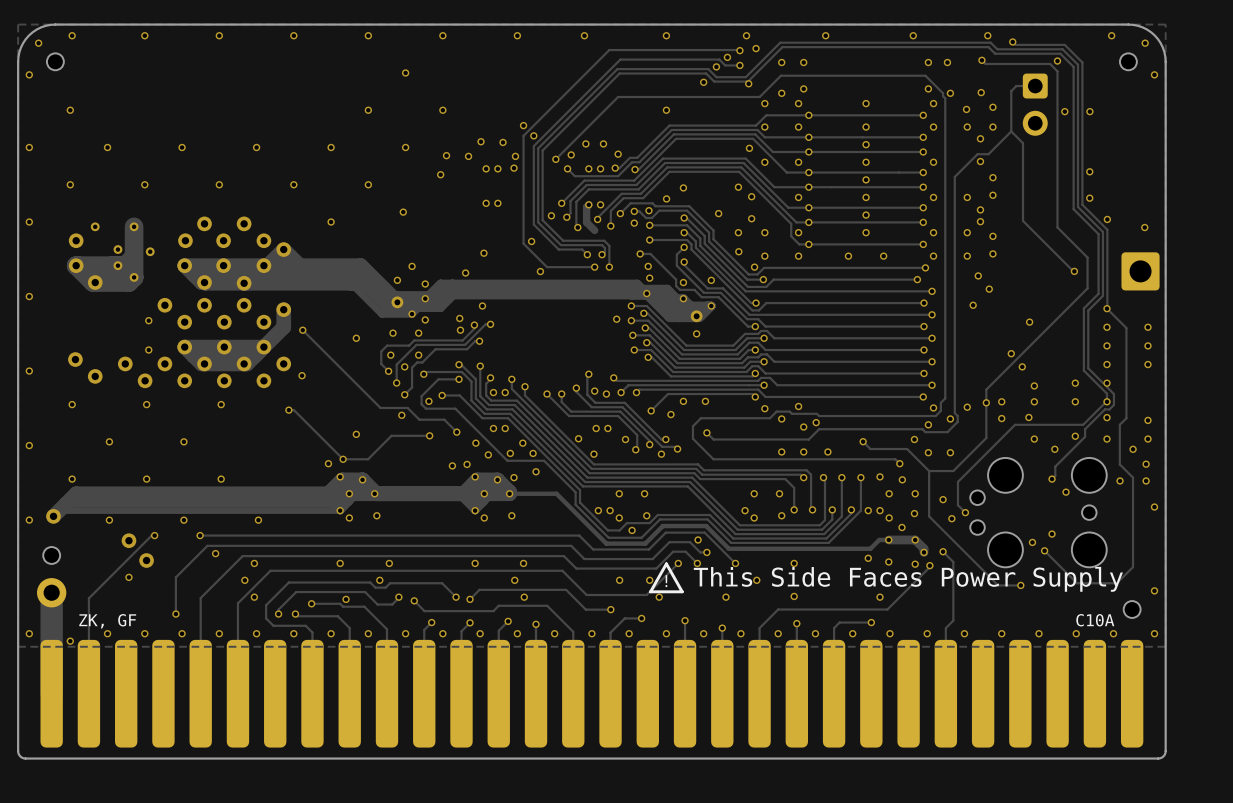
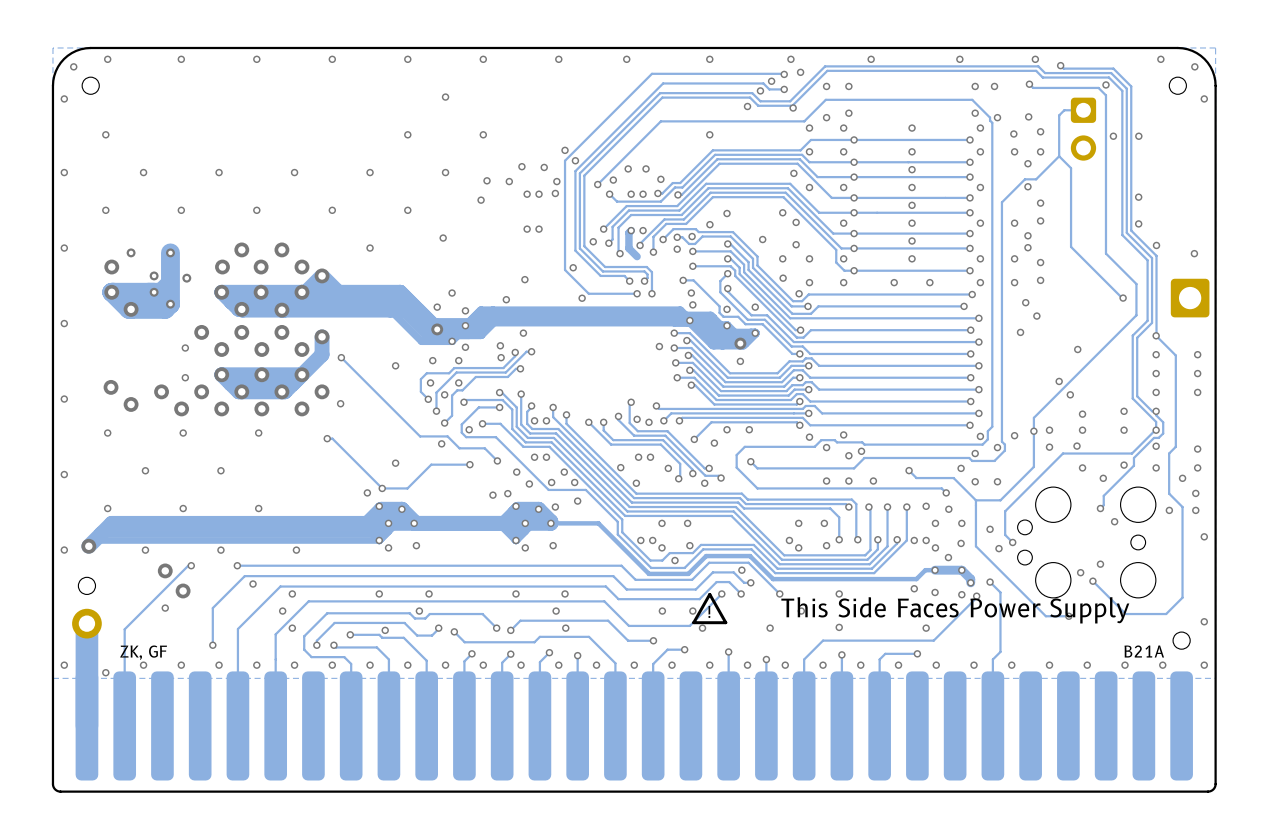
text: C10A (1095, 620) -> B21A (1144, 651)

